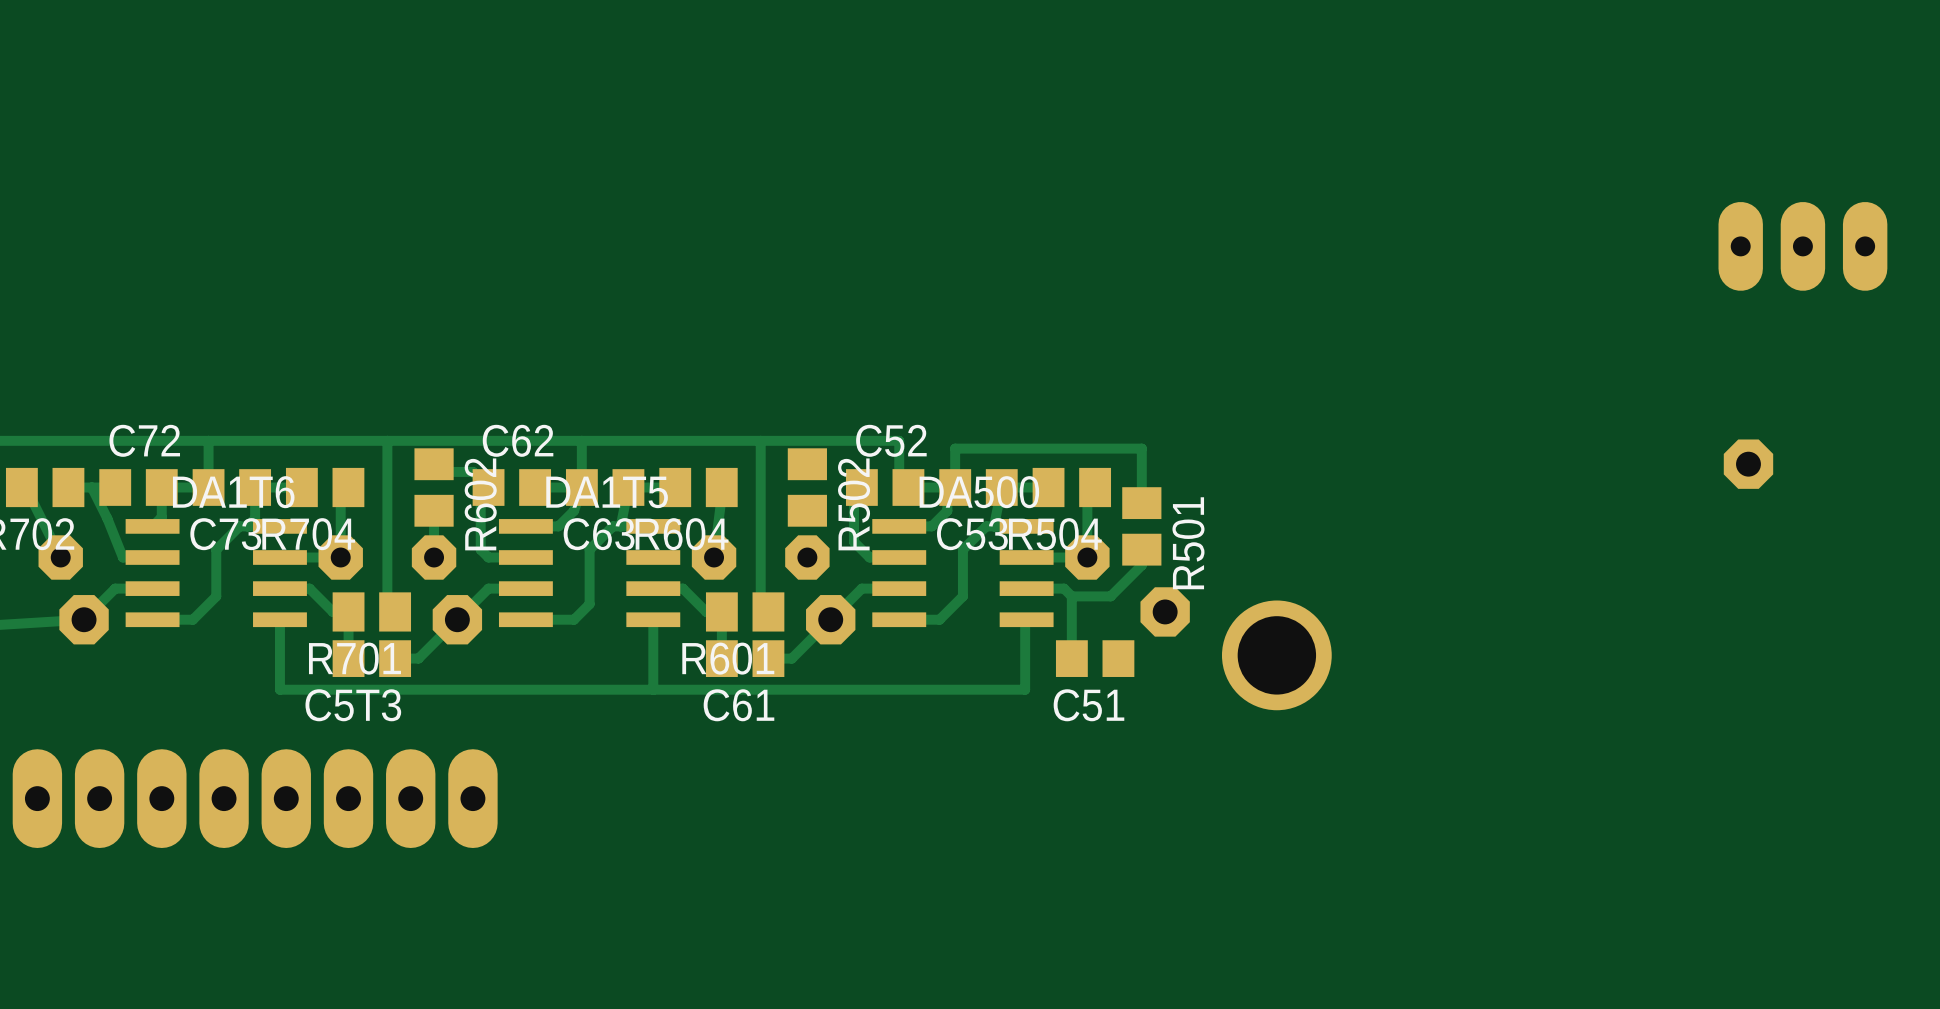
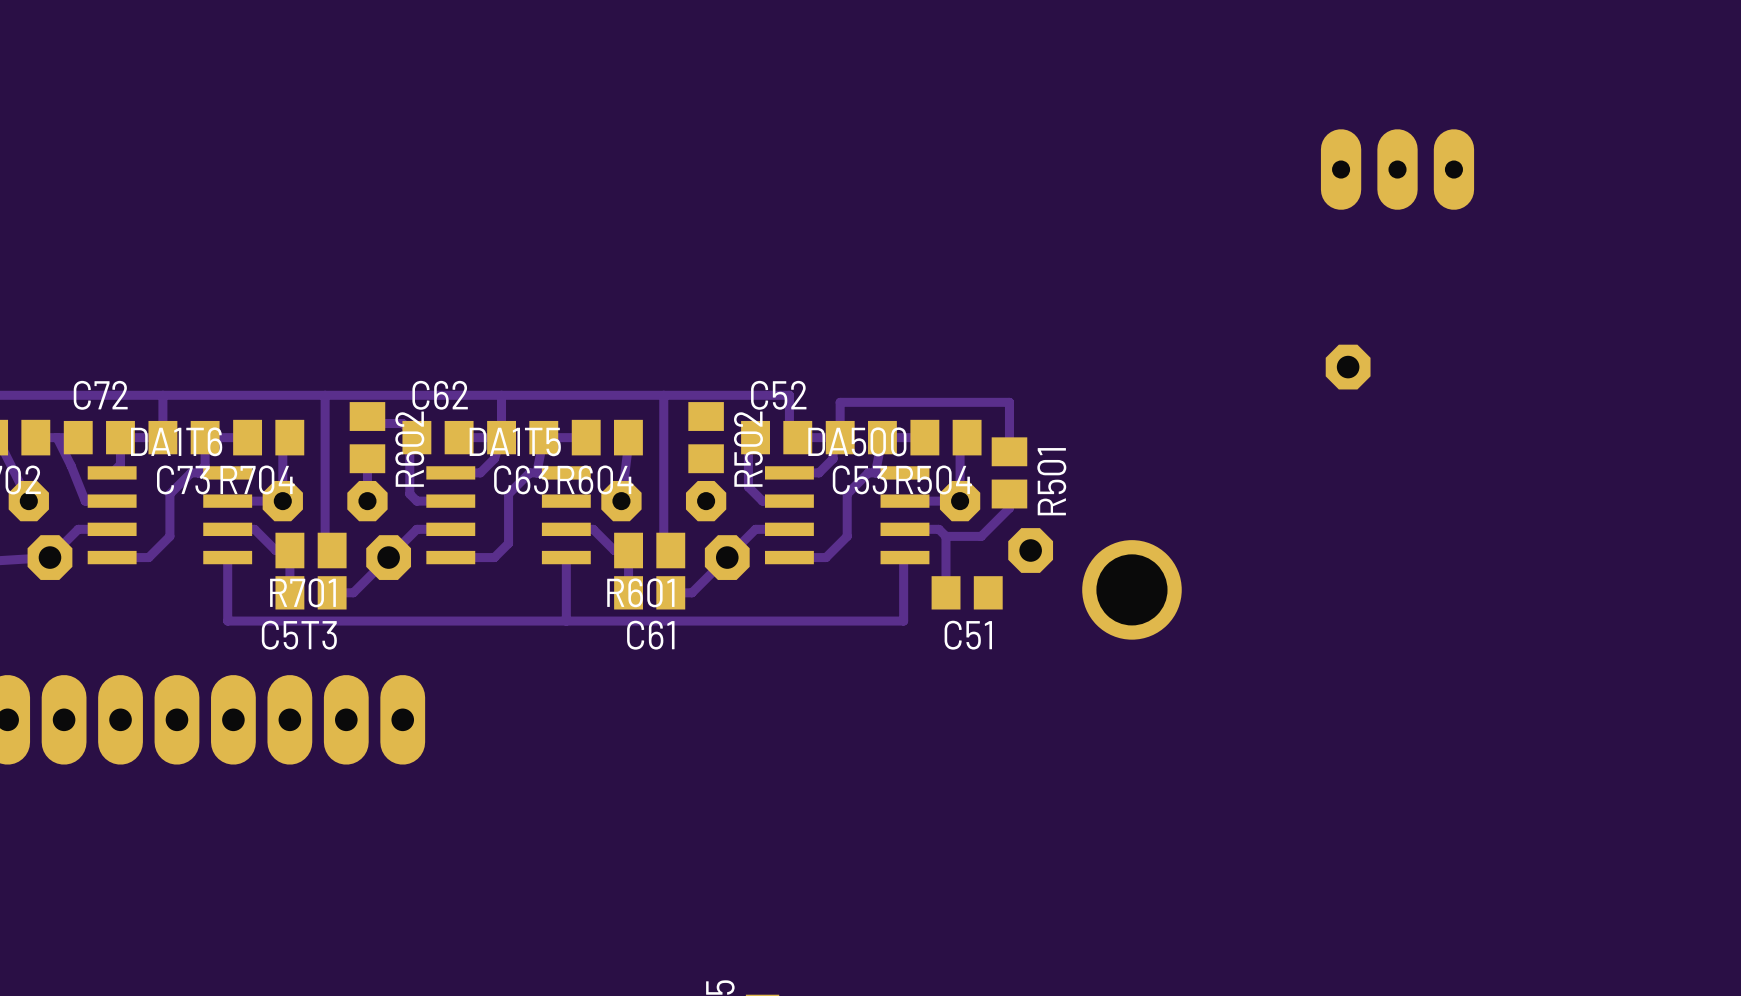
part position: (1802, 246) -> (1397, 169)
part position: (1748, 464) -> (1348, 367)

